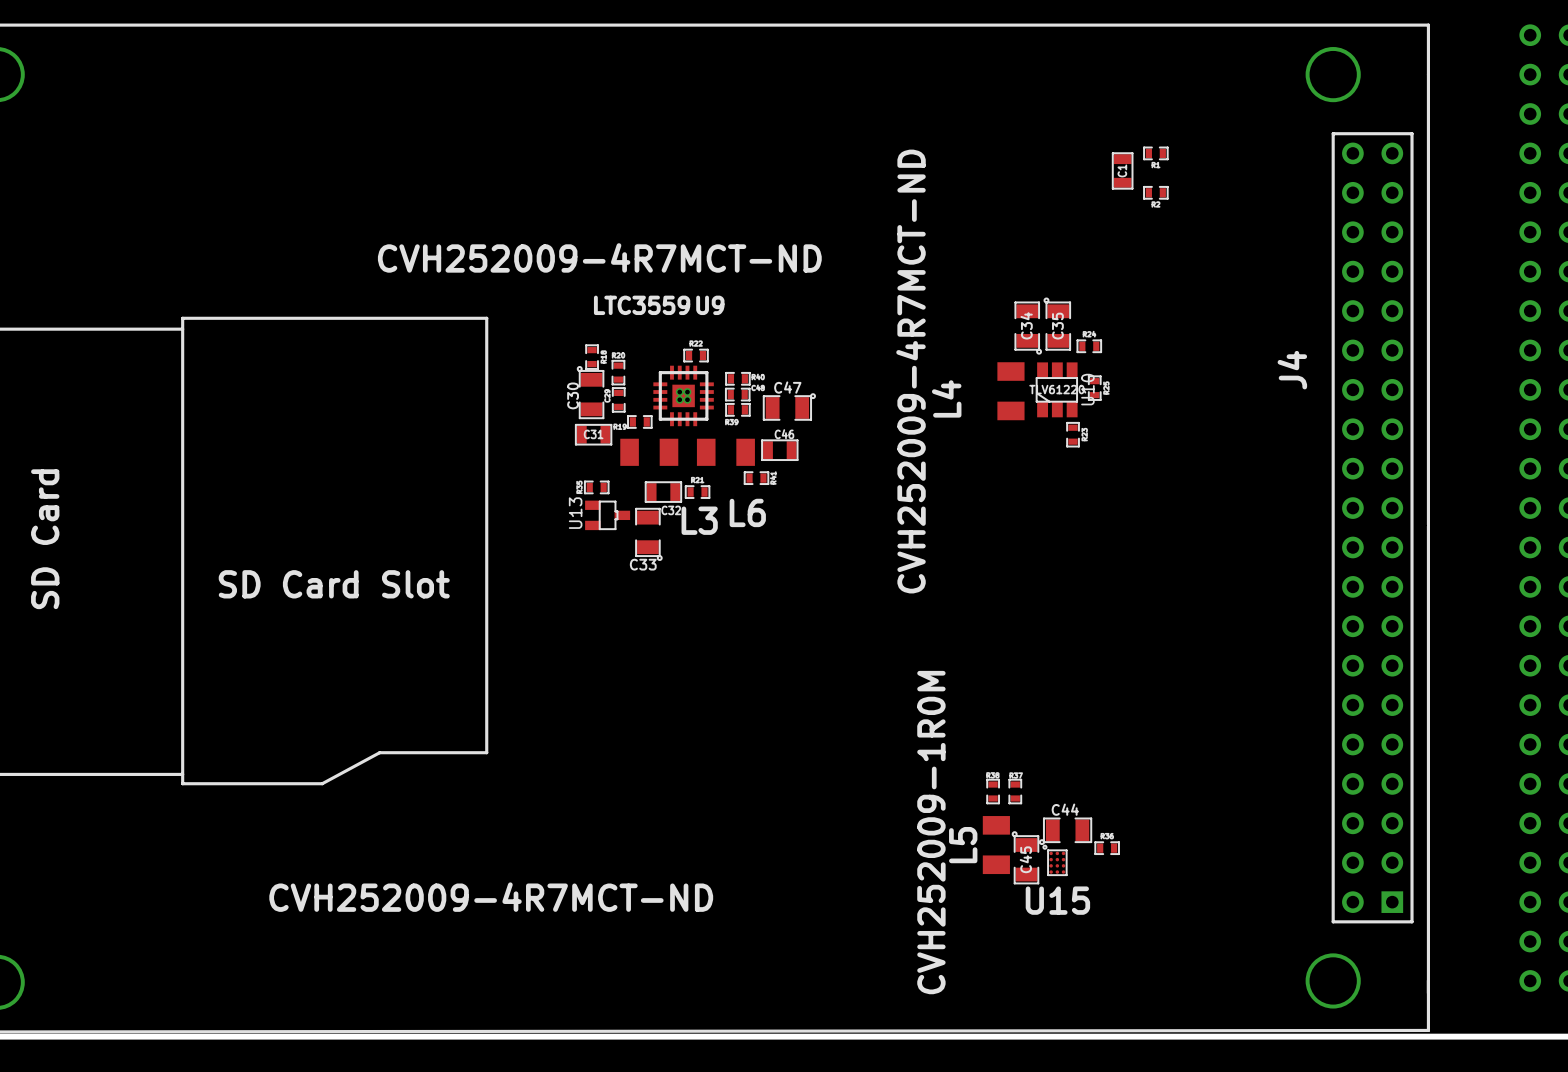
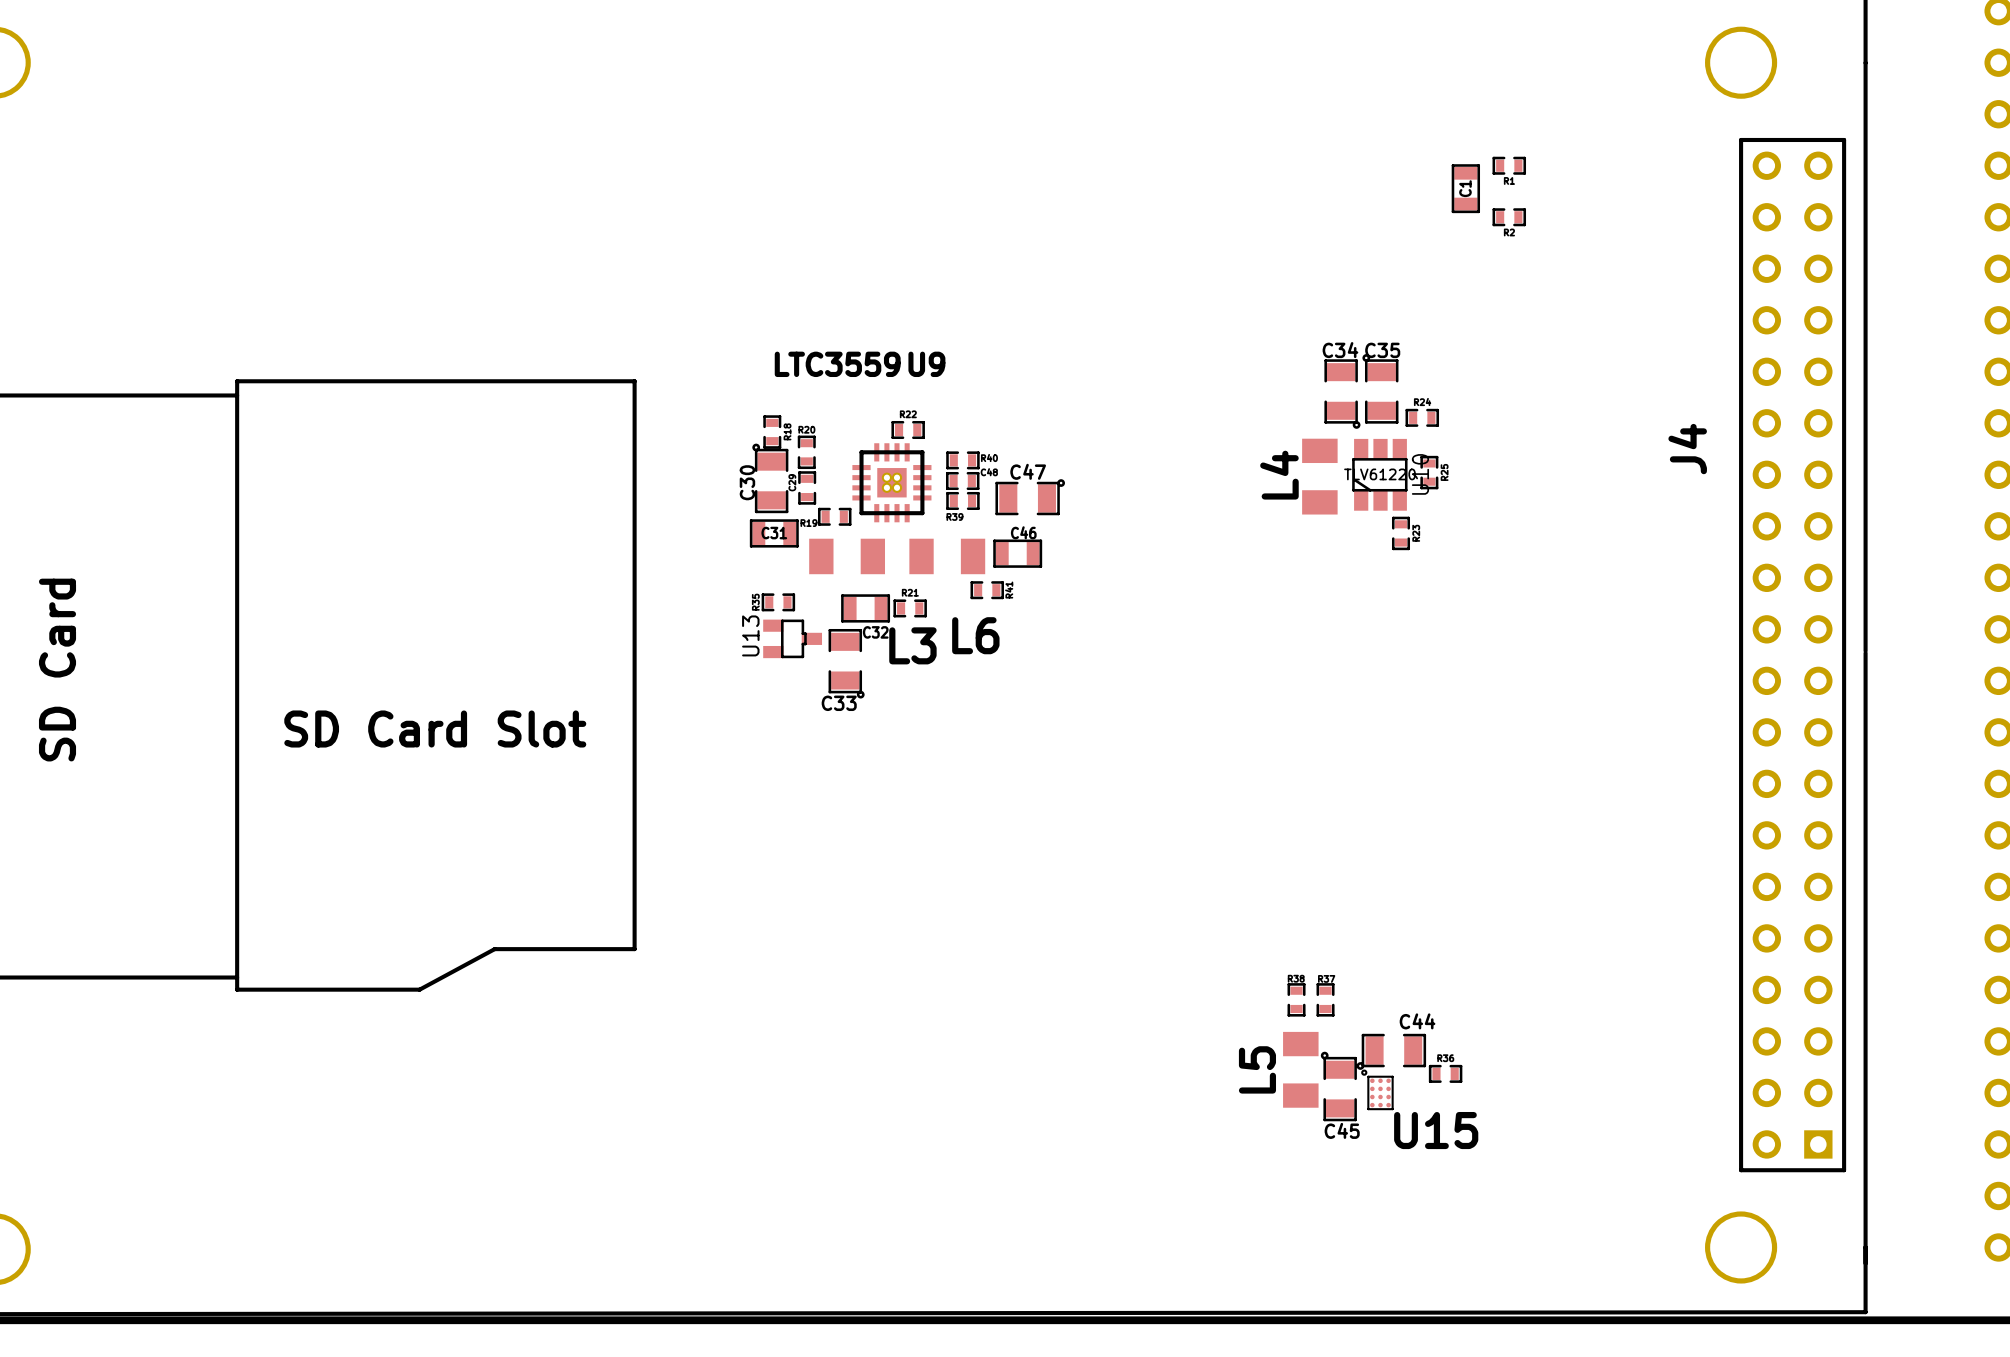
L3 value: CVH252009-4R7MCT-ND (599, 257) -> none
C34 name rotation: 0° (1026, 325) -> 90° clockwise (1340, 350)
C35 name rotation: 0° (1057, 326) -> 90° clockwise (1382, 350)
L4 value: CVH252009-4R7MCT-ND (911, 371) -> none
L4 name position: L4 (946, 398) -> L4 (1279, 475)
C44 name position: C44 (1065, 809) -> C44 (1417, 1021)
L5 value: CVH252009-1R0M (931, 832) -> none
C45 name rotation: 0° (1025, 859) -> 90° clockwise (1342, 1130)
L6 value: CVH252009-4R7MCT-ND (491, 897) -> none
U15 name position: U15 (1057, 900) -> U15 (1436, 1130)

